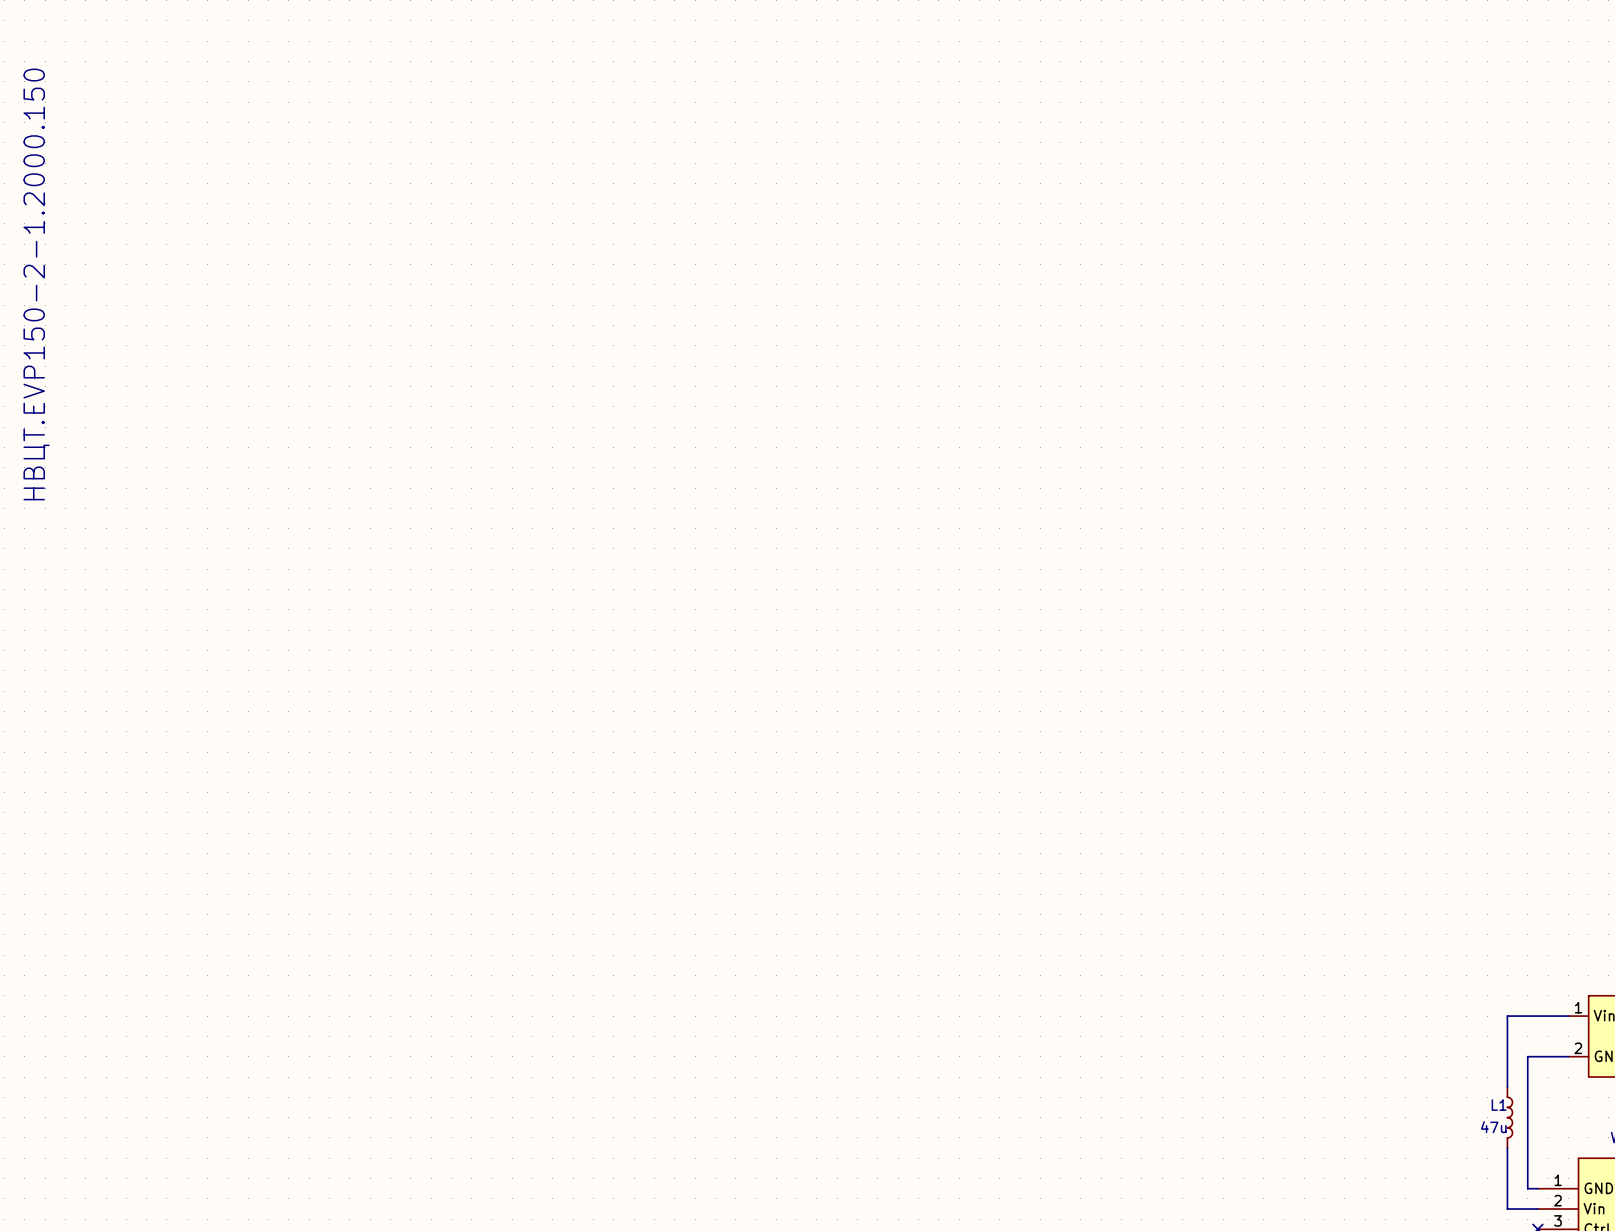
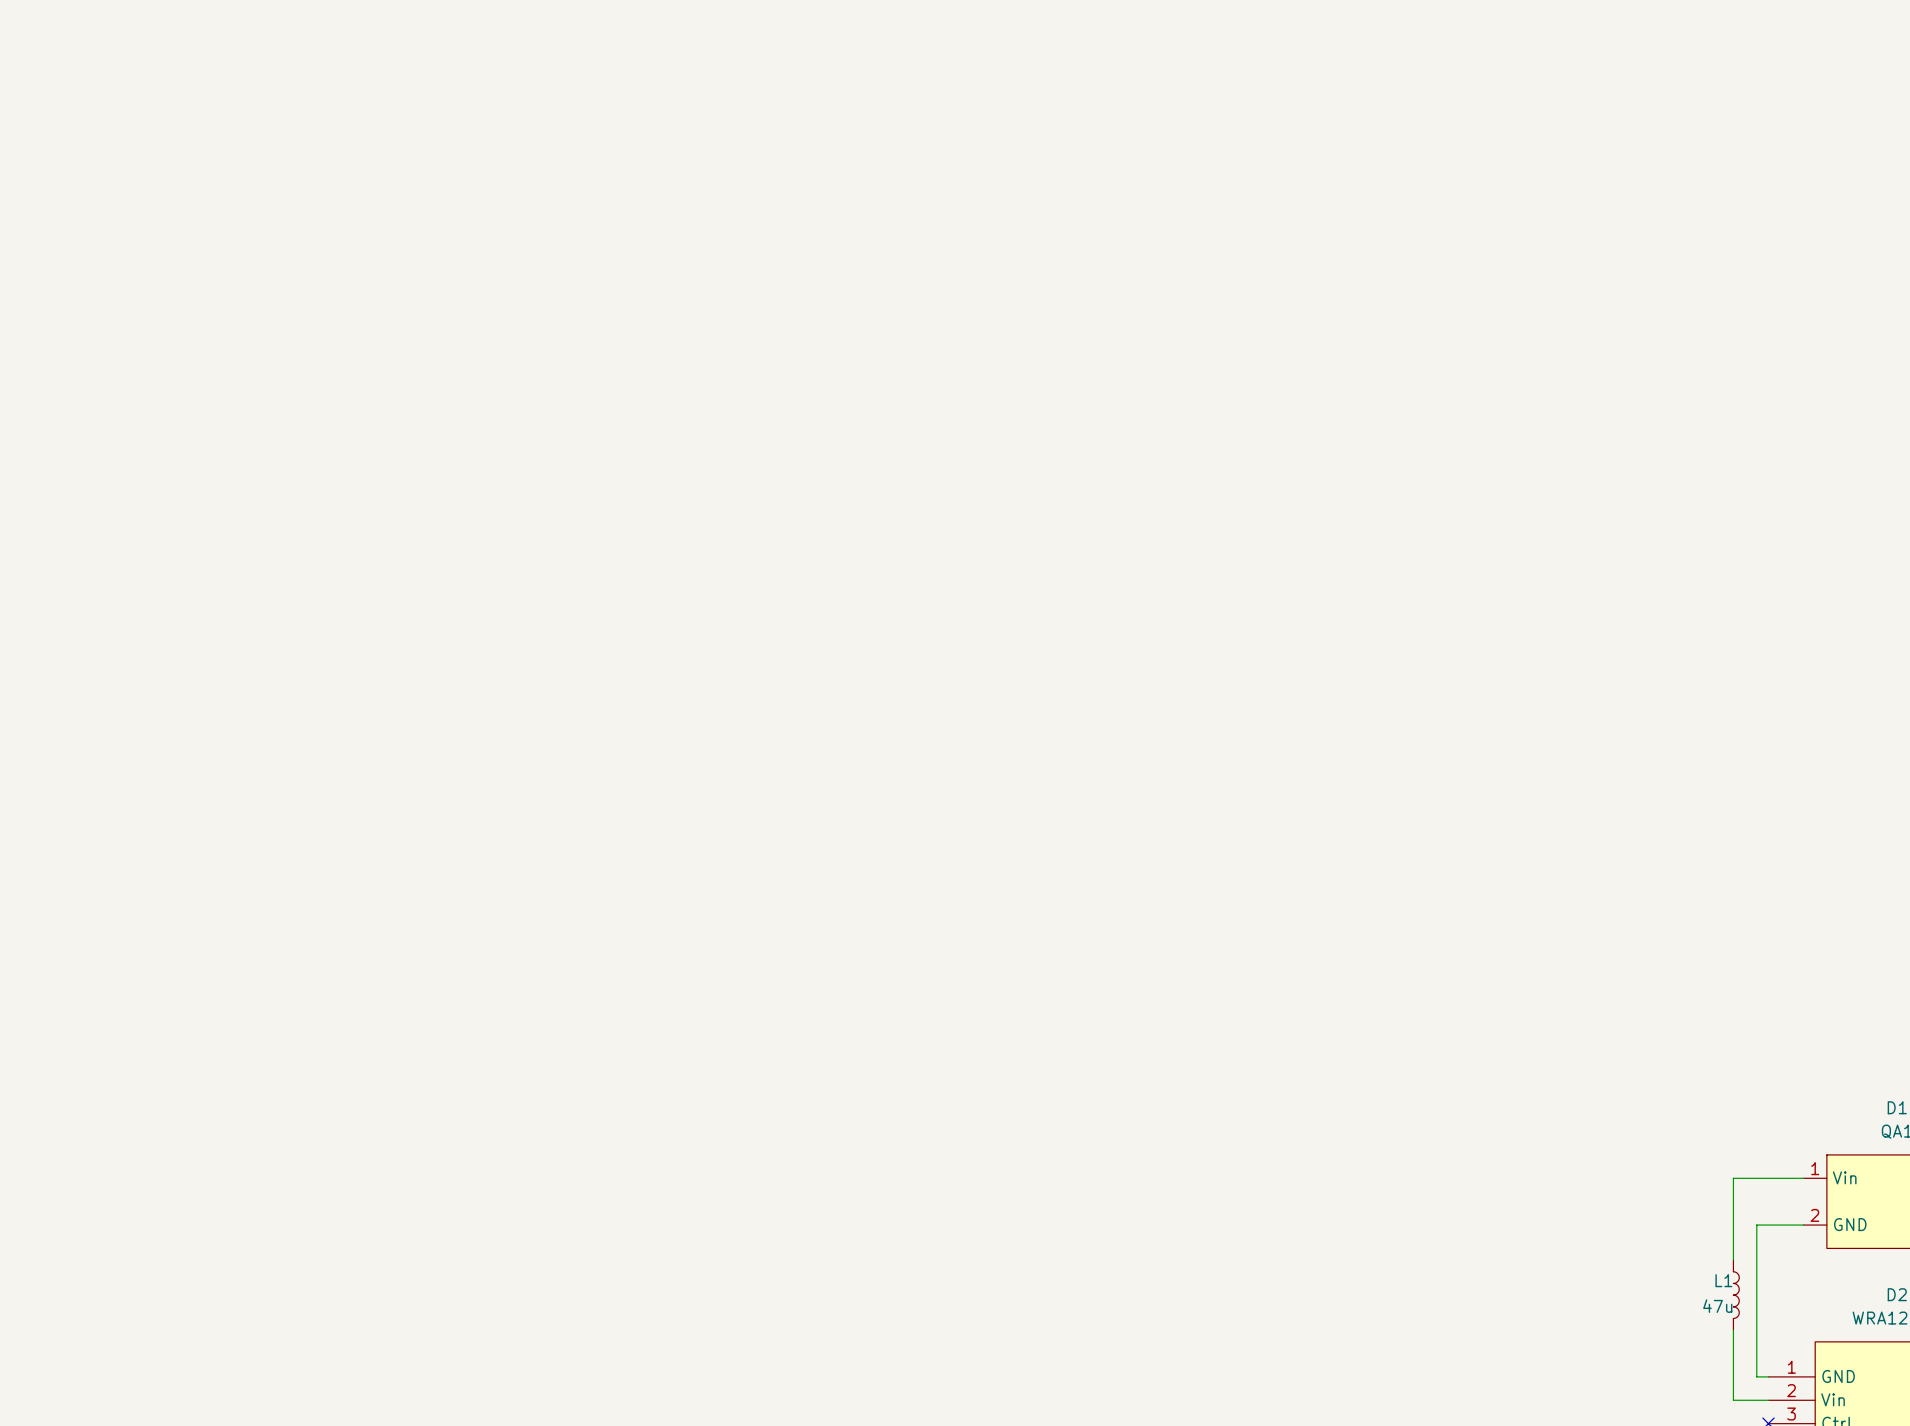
text: НВЦТ.EVP150-2-1.2000.150 (36, 284) -> none

